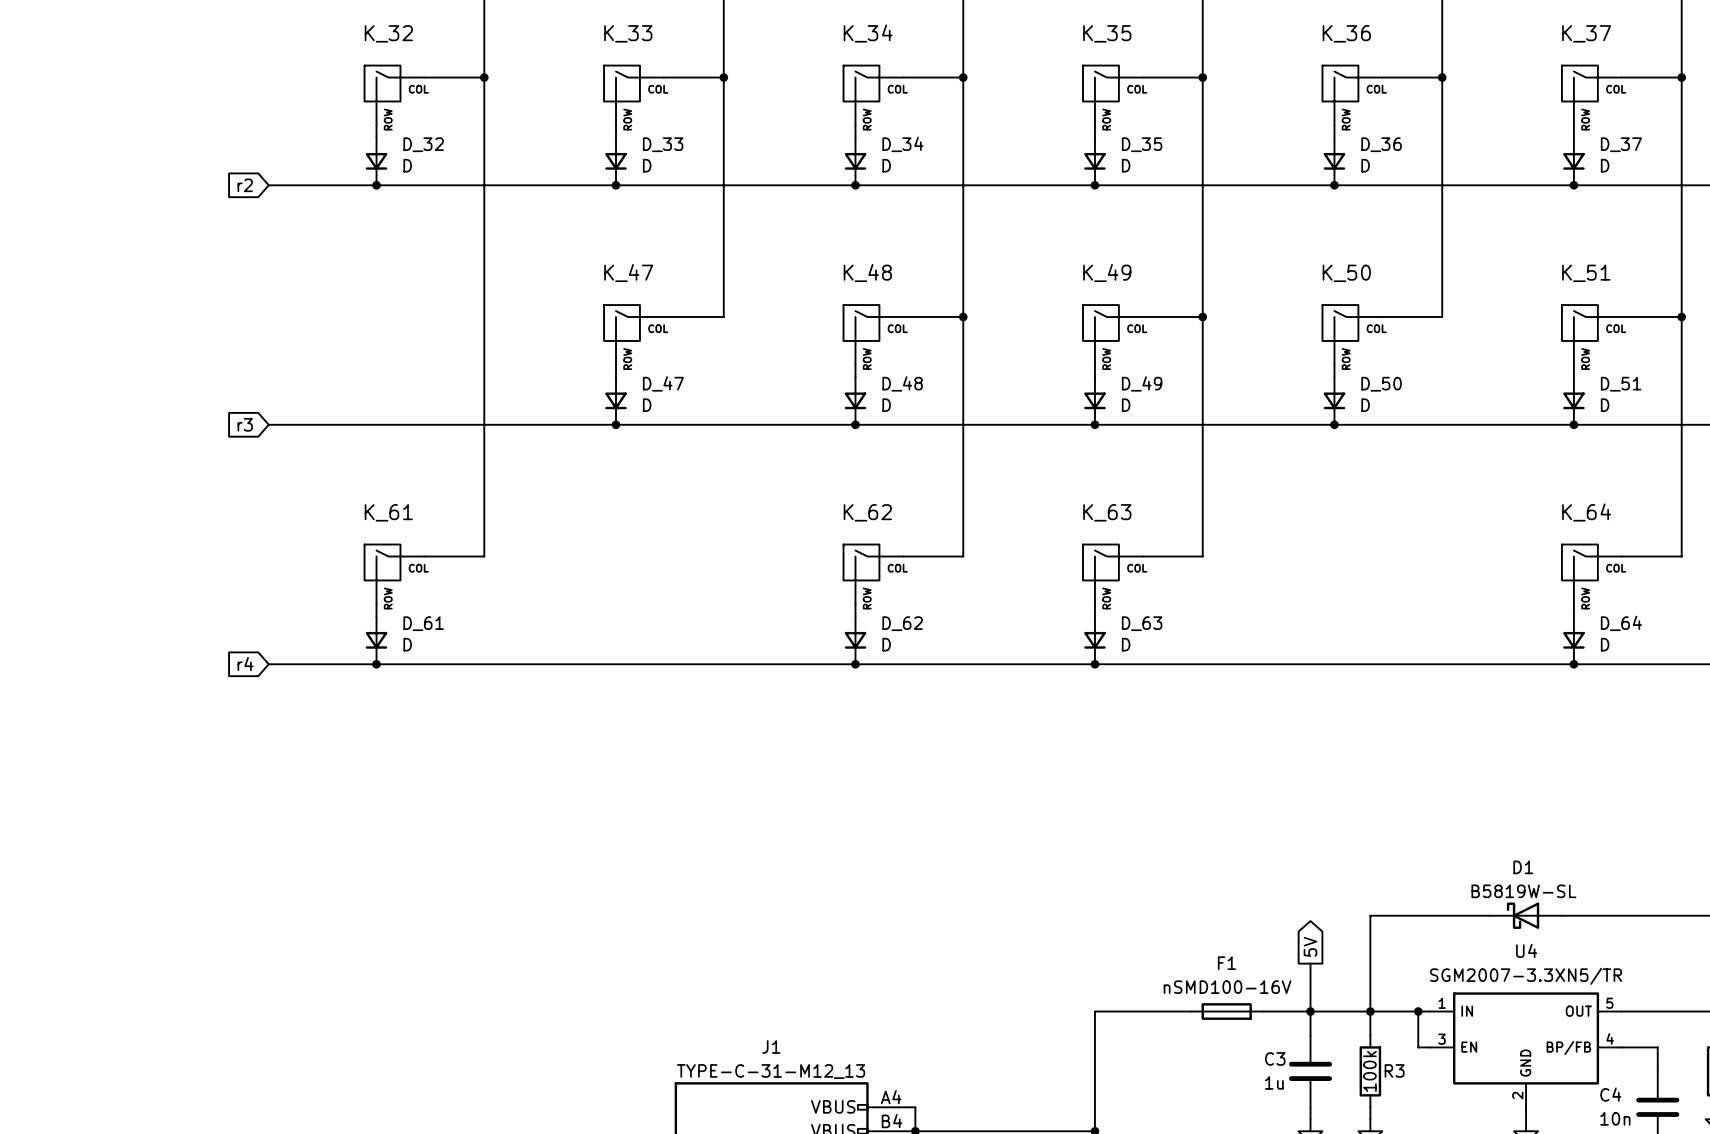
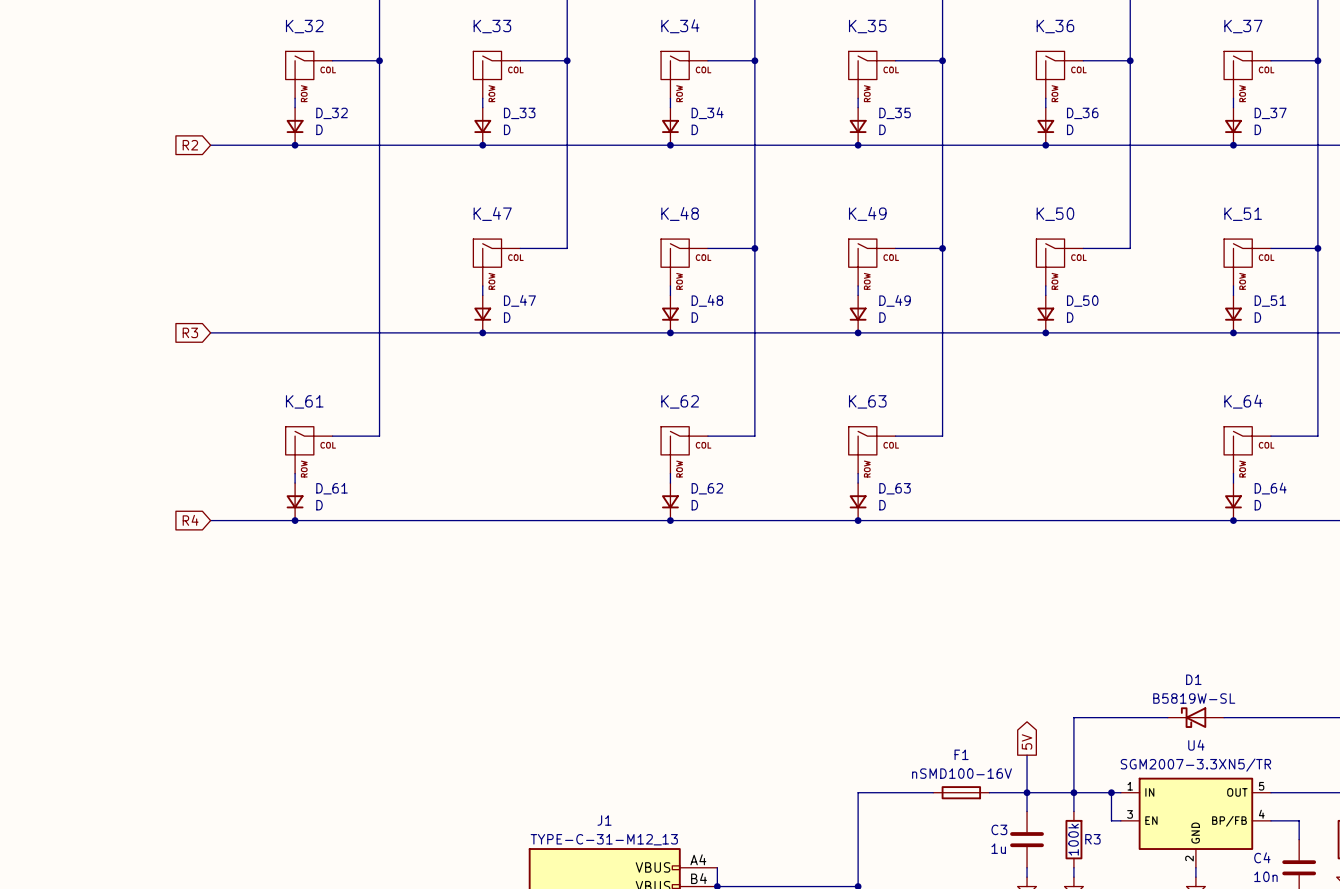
global label: r2 (245, 185) -> R2 (190, 145)
global label: r3 (245, 424) -> R3 (190, 332)
global label: r4 (245, 663) -> R4 (190, 520)

